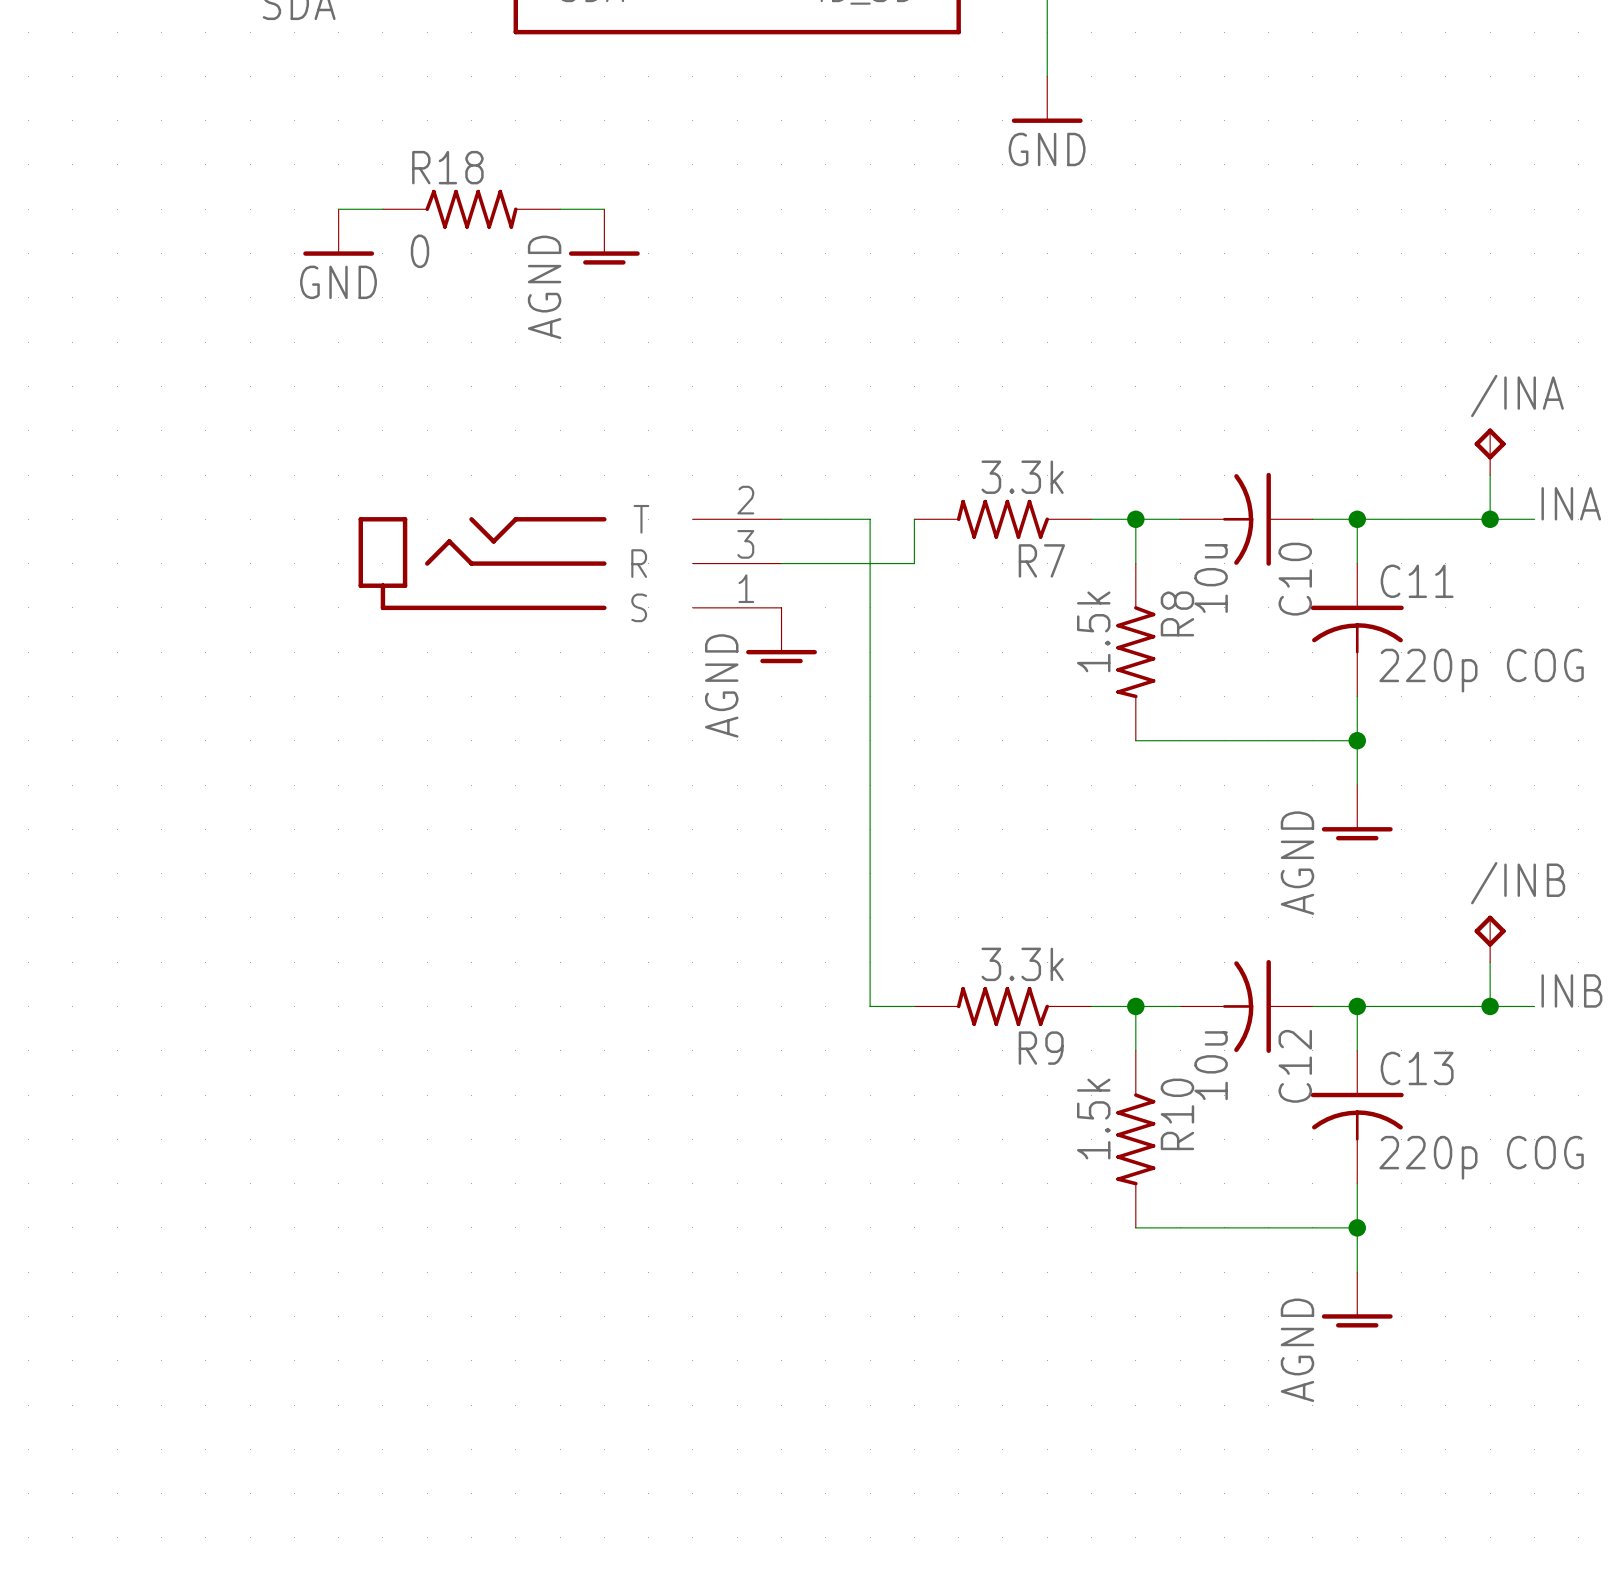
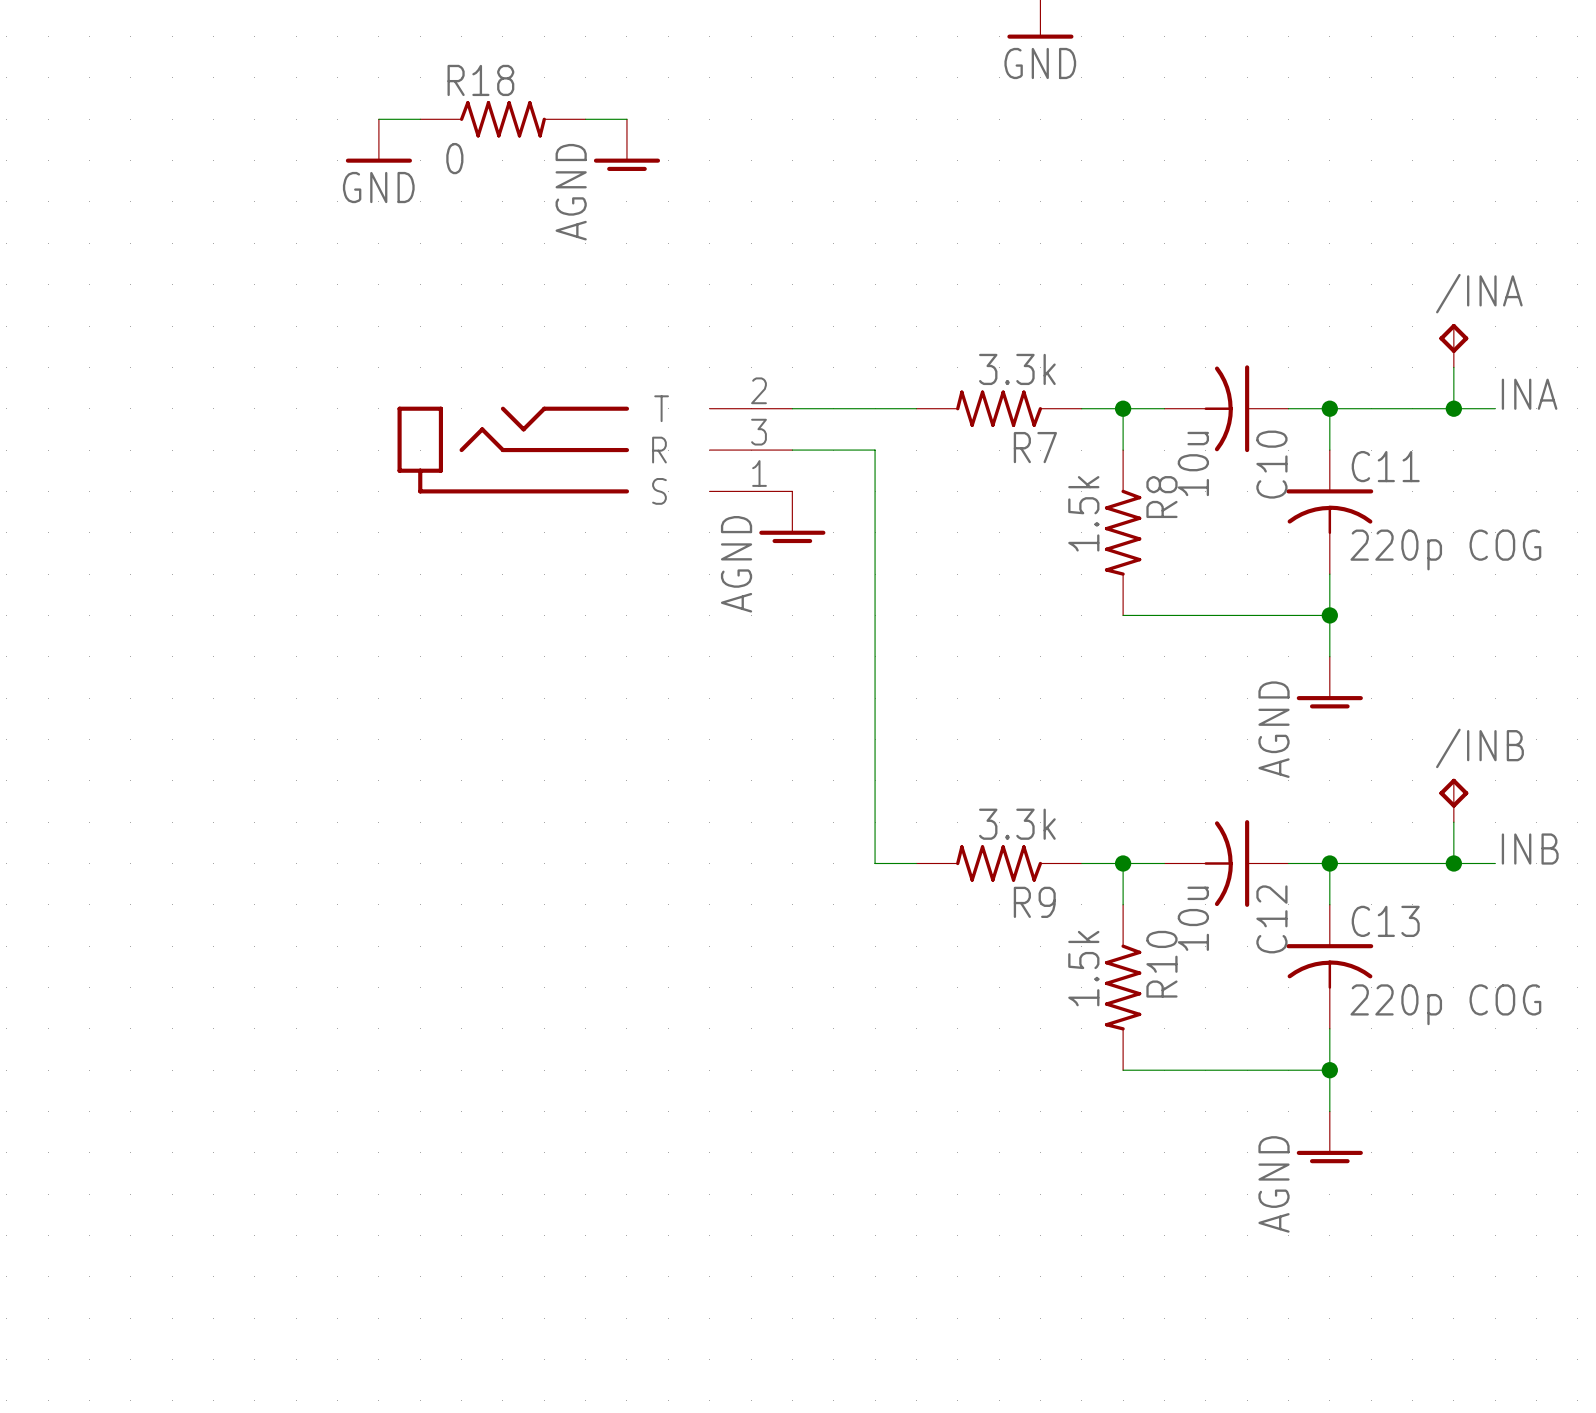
wire: (870, 519) (870, 563) (914, 563) (914, 519) -> (875, 408) (916, 408)

